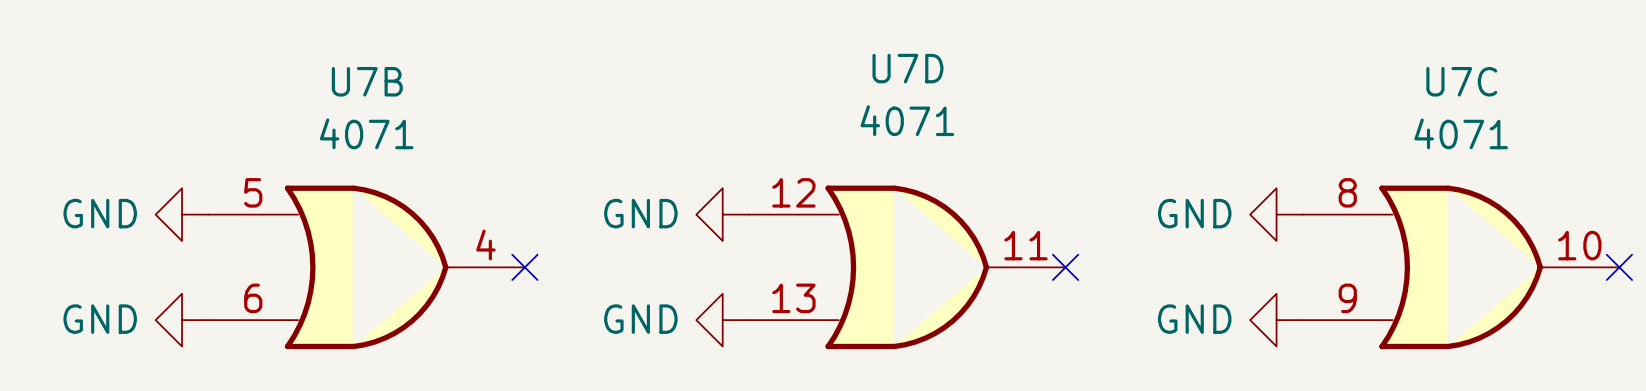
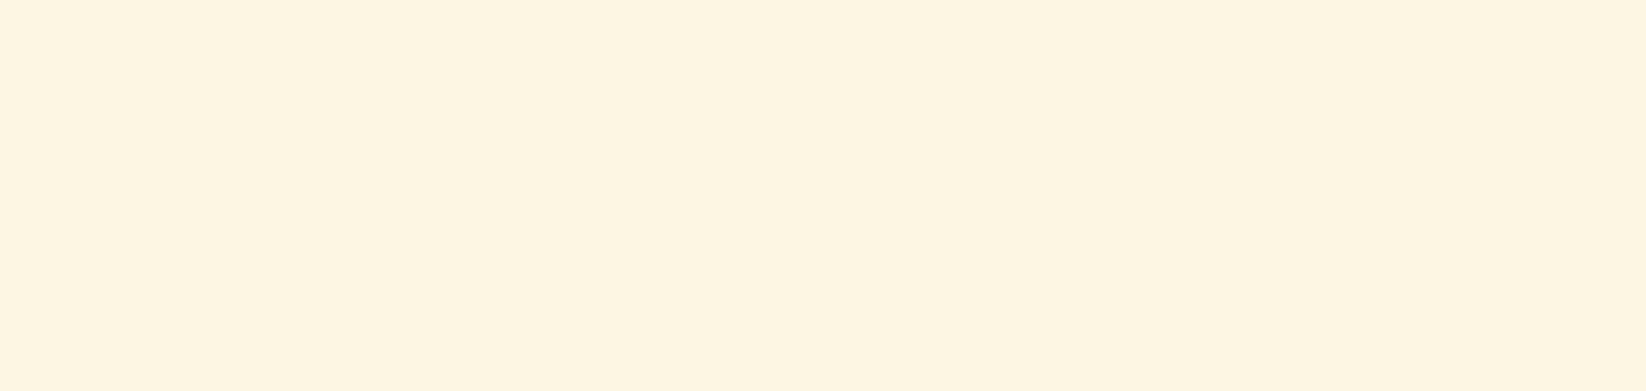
power symbol: GND (182, 214) -> none
power symbol: GND (722, 214) -> none
power symbol: GND (1276, 214) -> none
U7B: 4071 (366, 267) -> none
no-connect mark: (524, 267) -> none
U7D: 4071 (907, 267) -> none
no-connect mark: (1065, 267) -> none
U7C: 4071 (1461, 267) -> none
no-connect mark: (1619, 267) -> none
power symbol: GND (182, 320) -> none
power symbol: GND (722, 320) -> none
power symbol: GND (1276, 320) -> none

